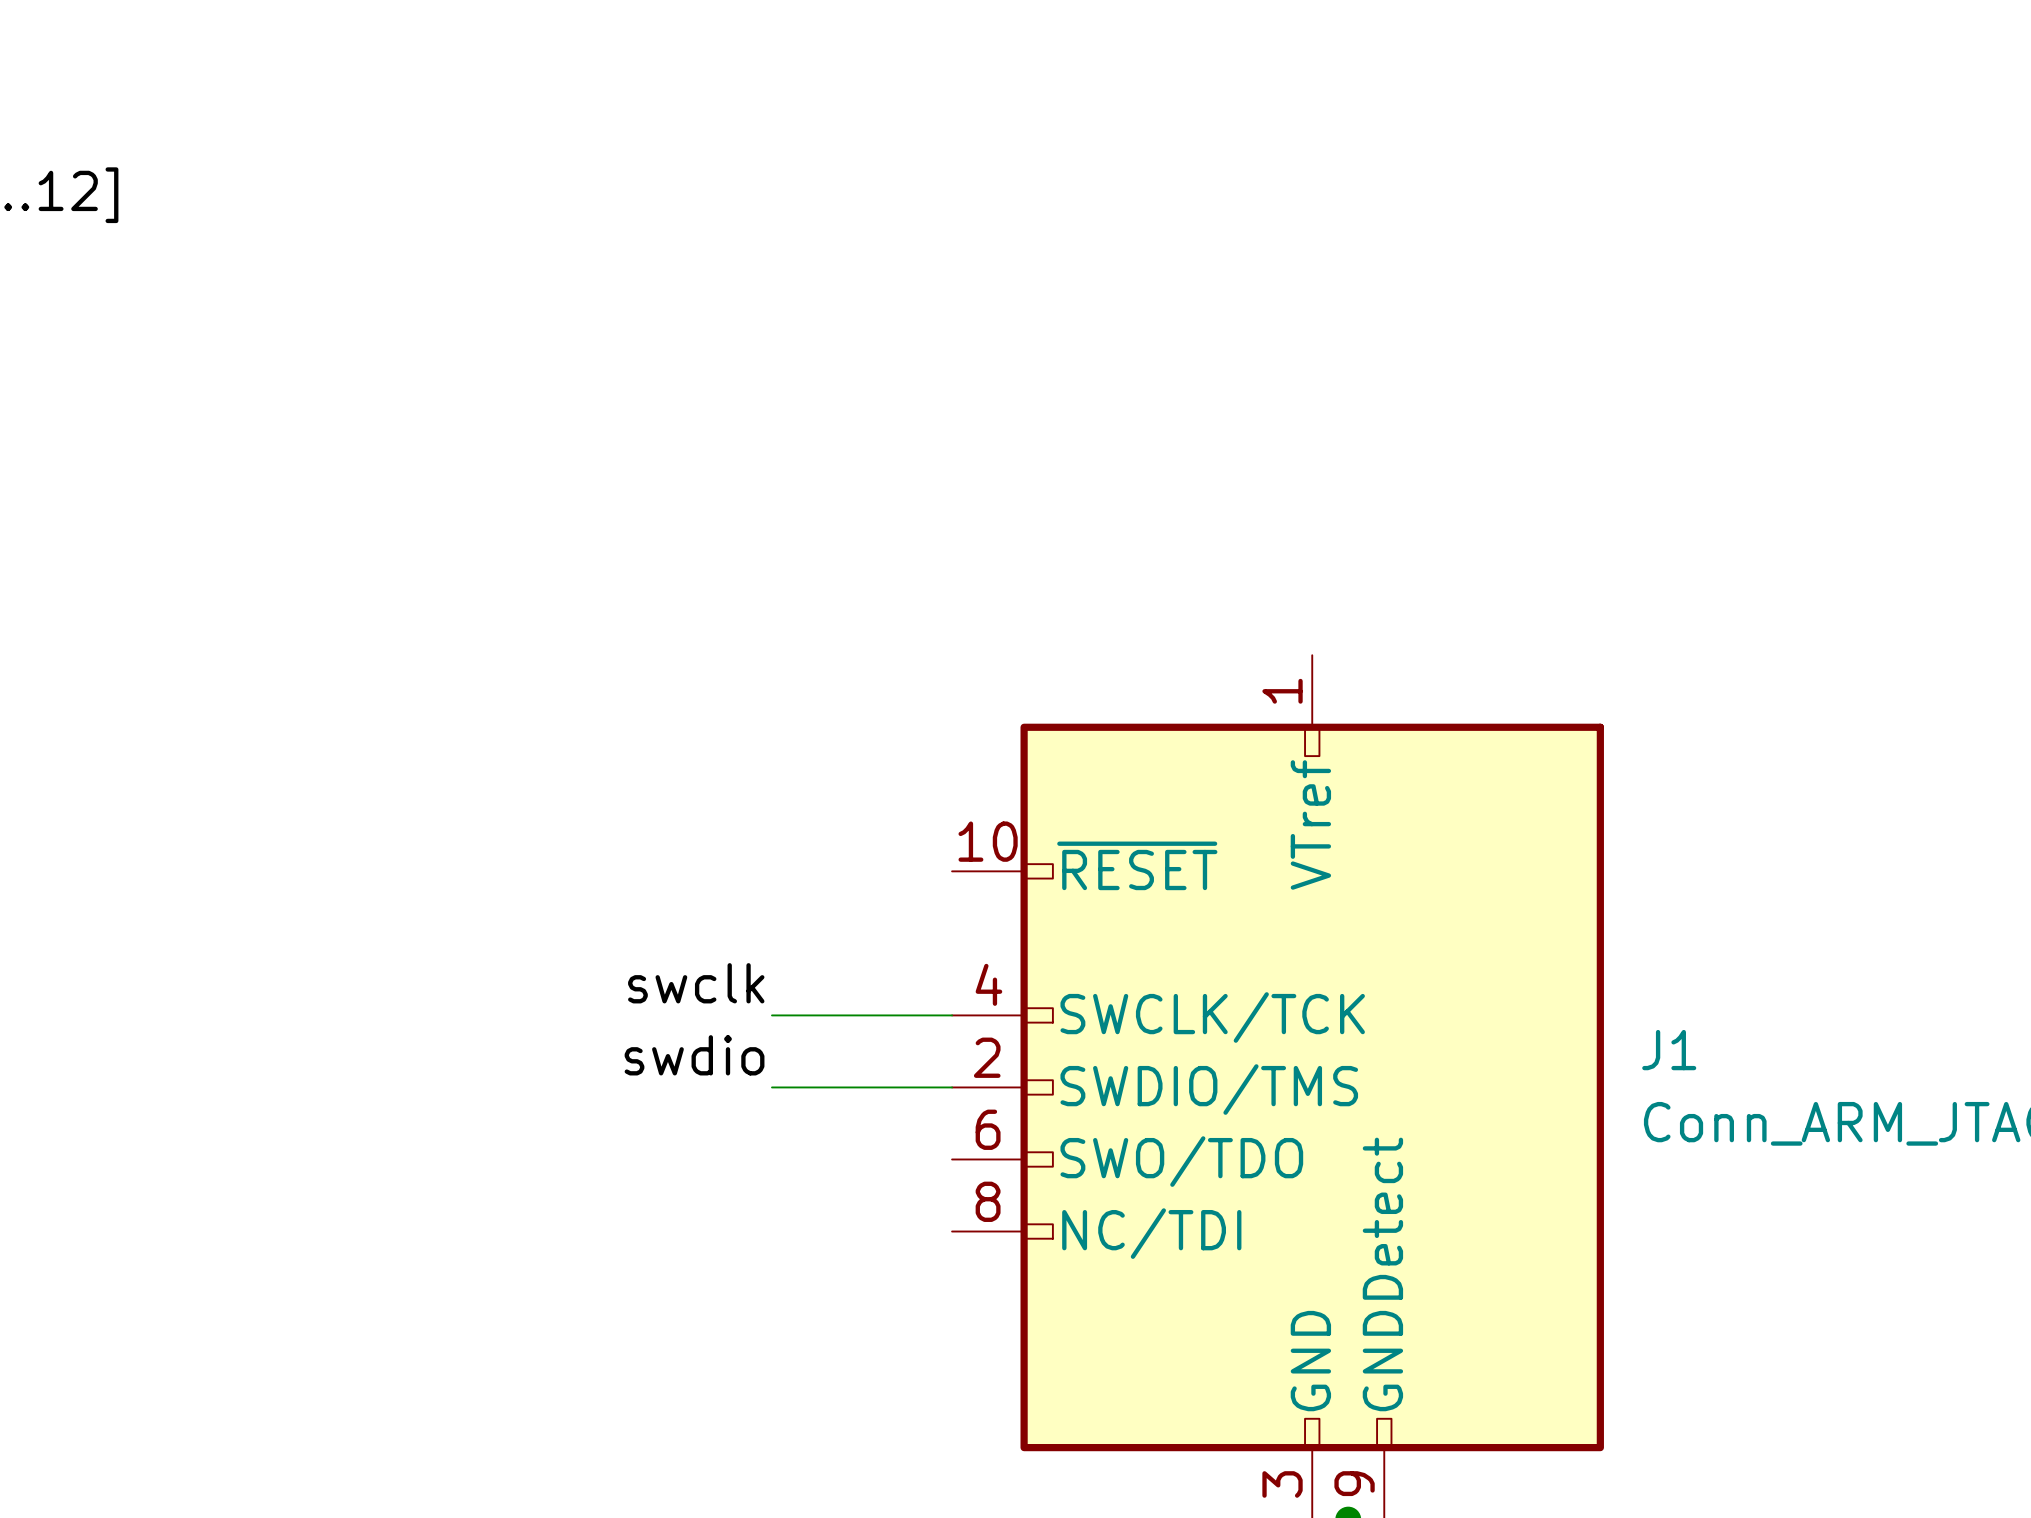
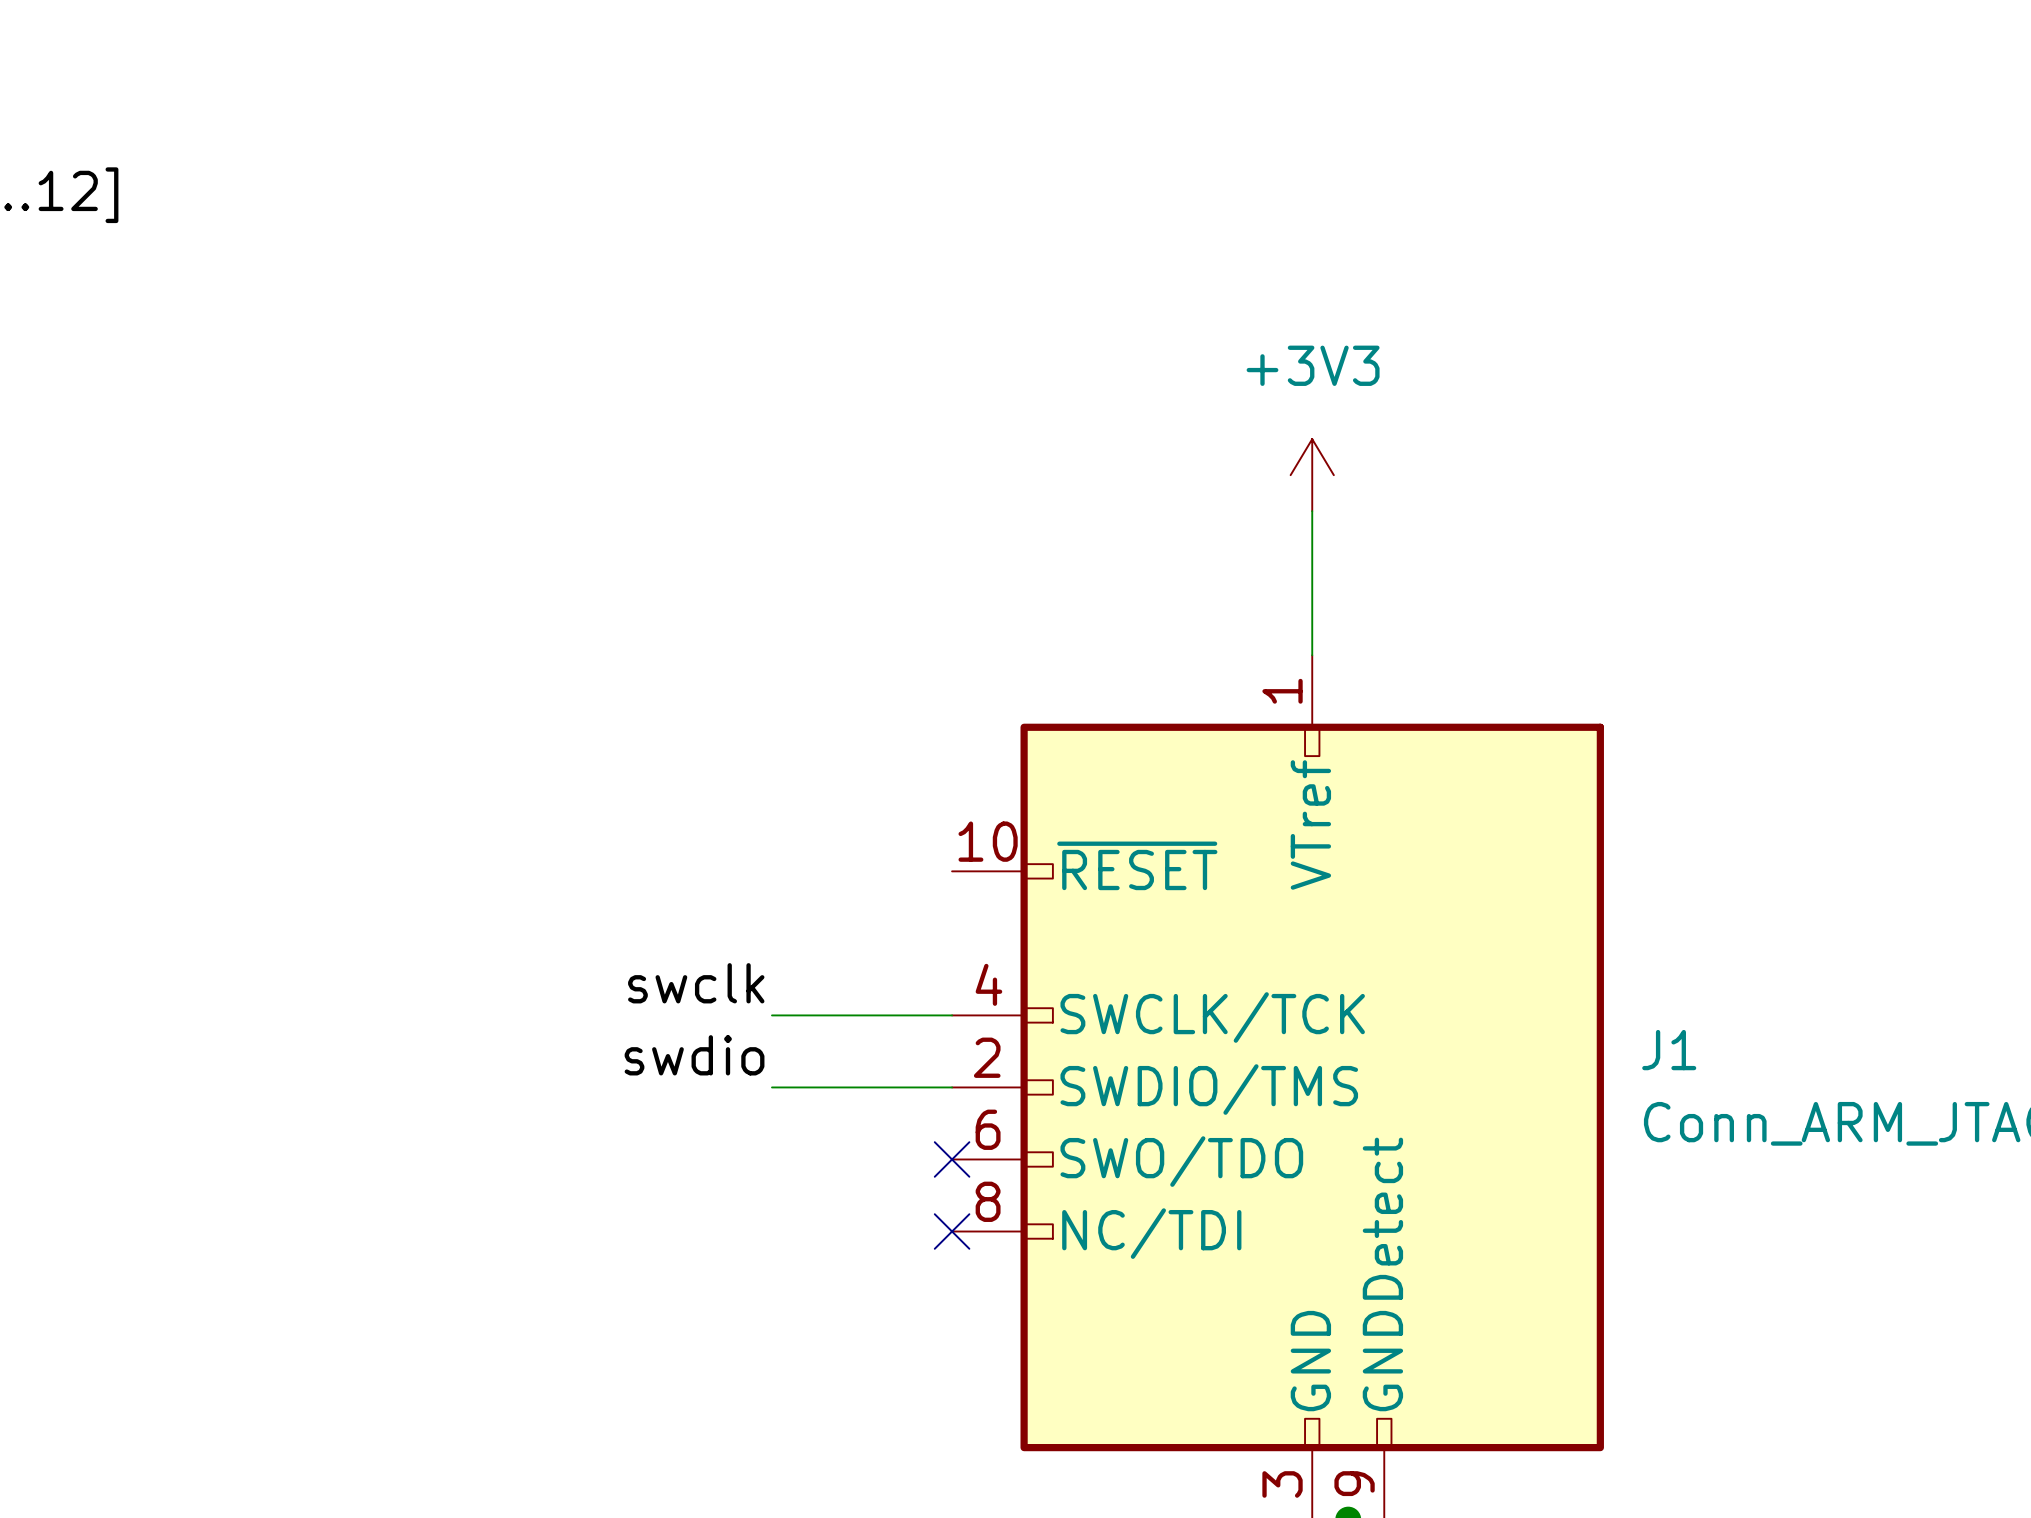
power symbol: none -> +3V3 (1312, 475)
wire: none -> (1312, 511) (1312, 655)
no-connect mark: none -> (952, 1159)
no-connect mark: none -> (952, 1231)

